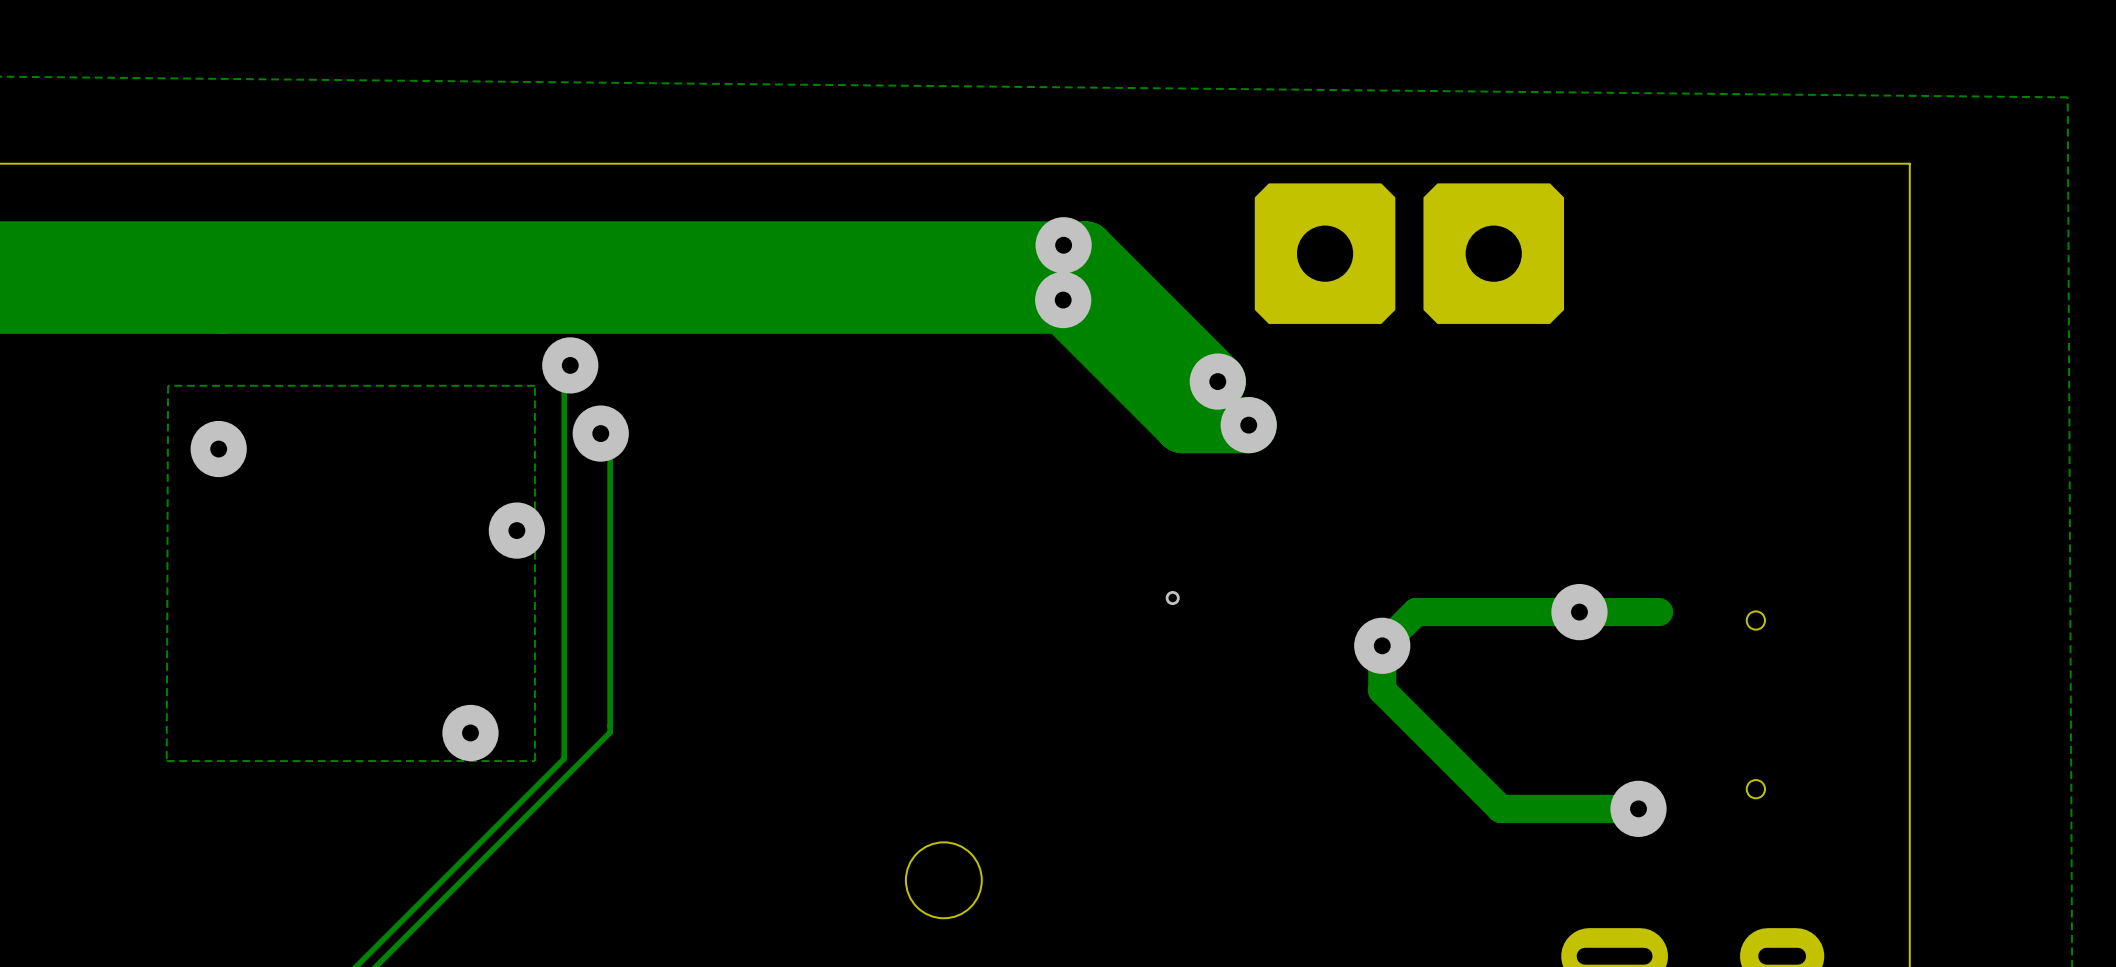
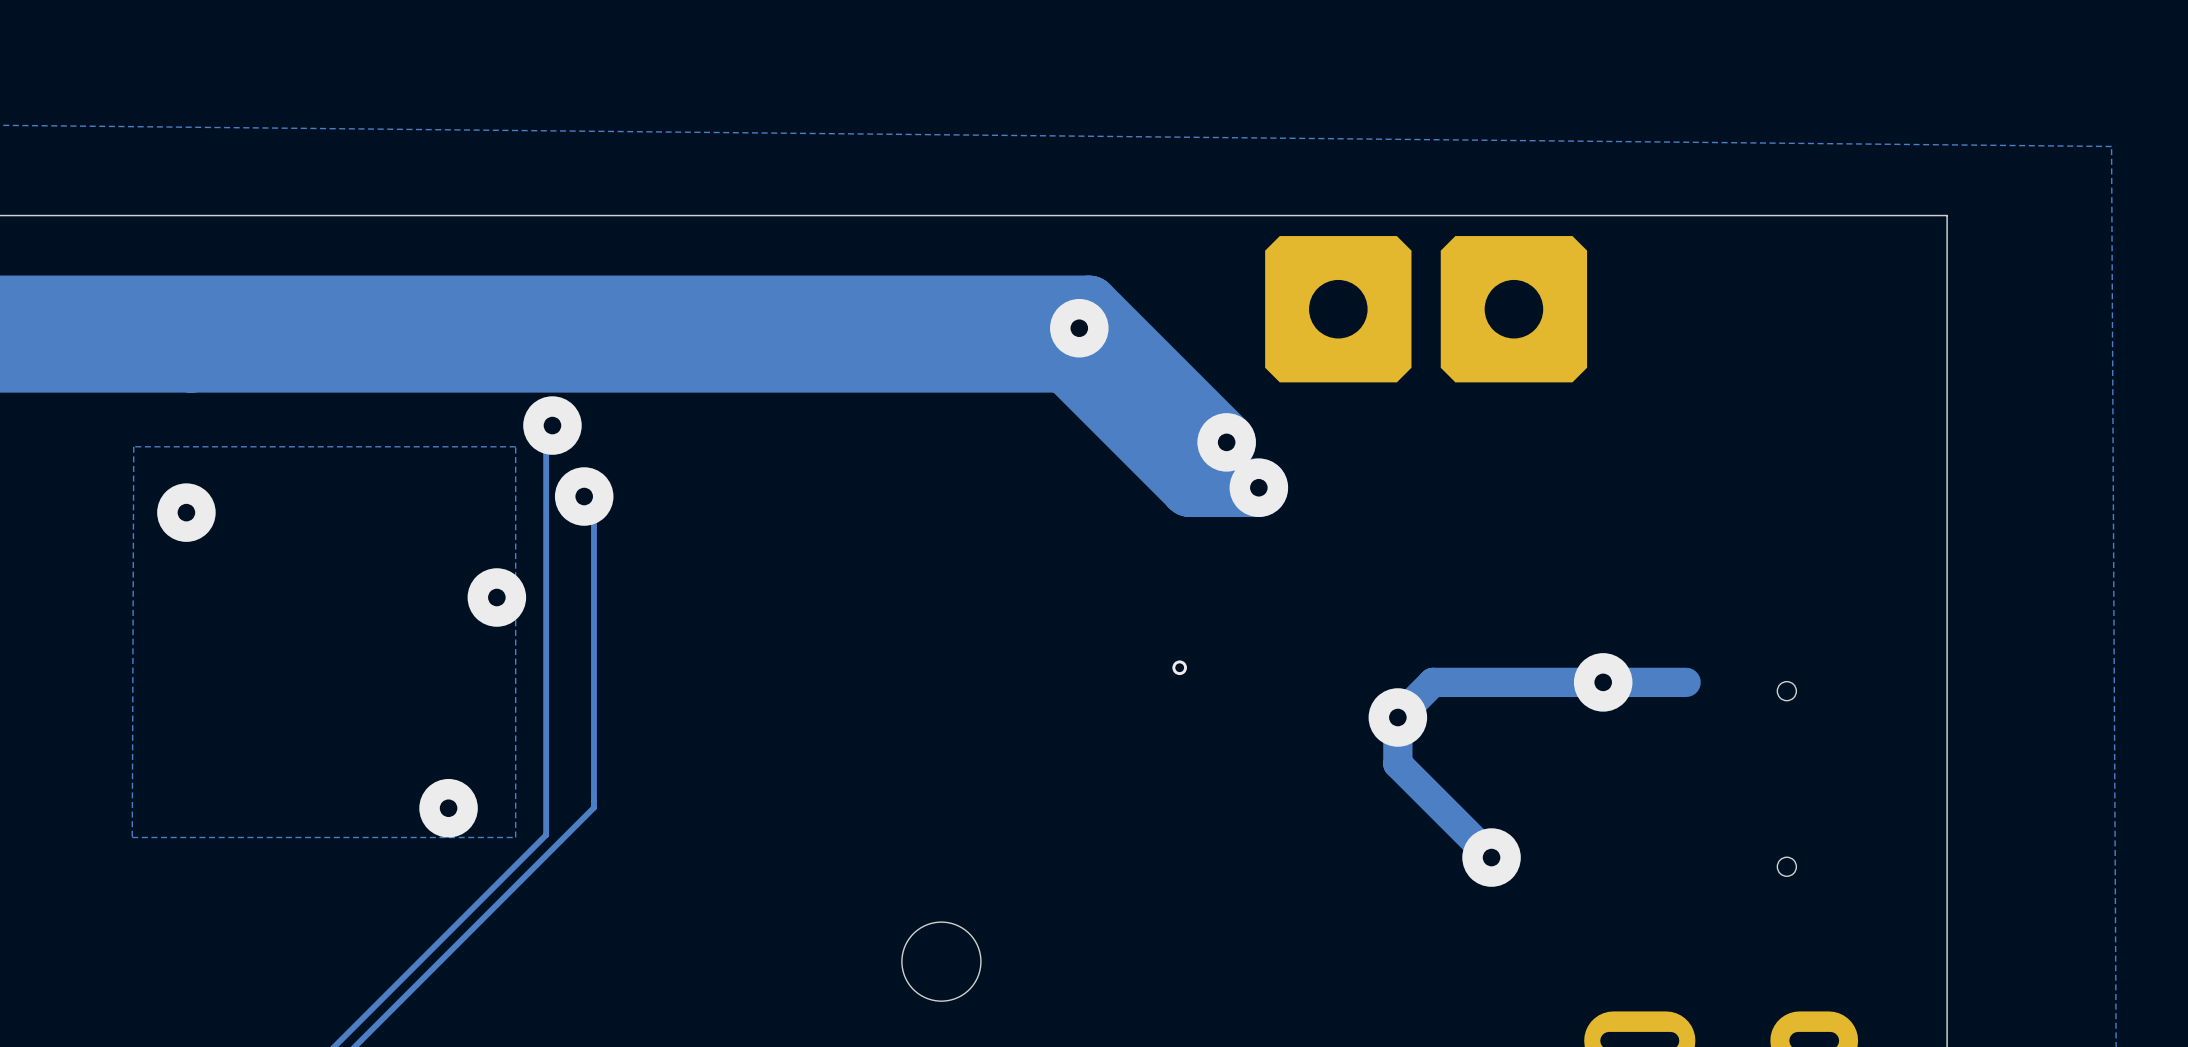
via: (1063, 245) -> none
via: none -> (1079, 328)
via: (1063, 300) -> none
track: (1472, 780) (1500, 808) (1638, 808) -> none
via: none -> (1491, 857)
via: (1638, 808) -> none

